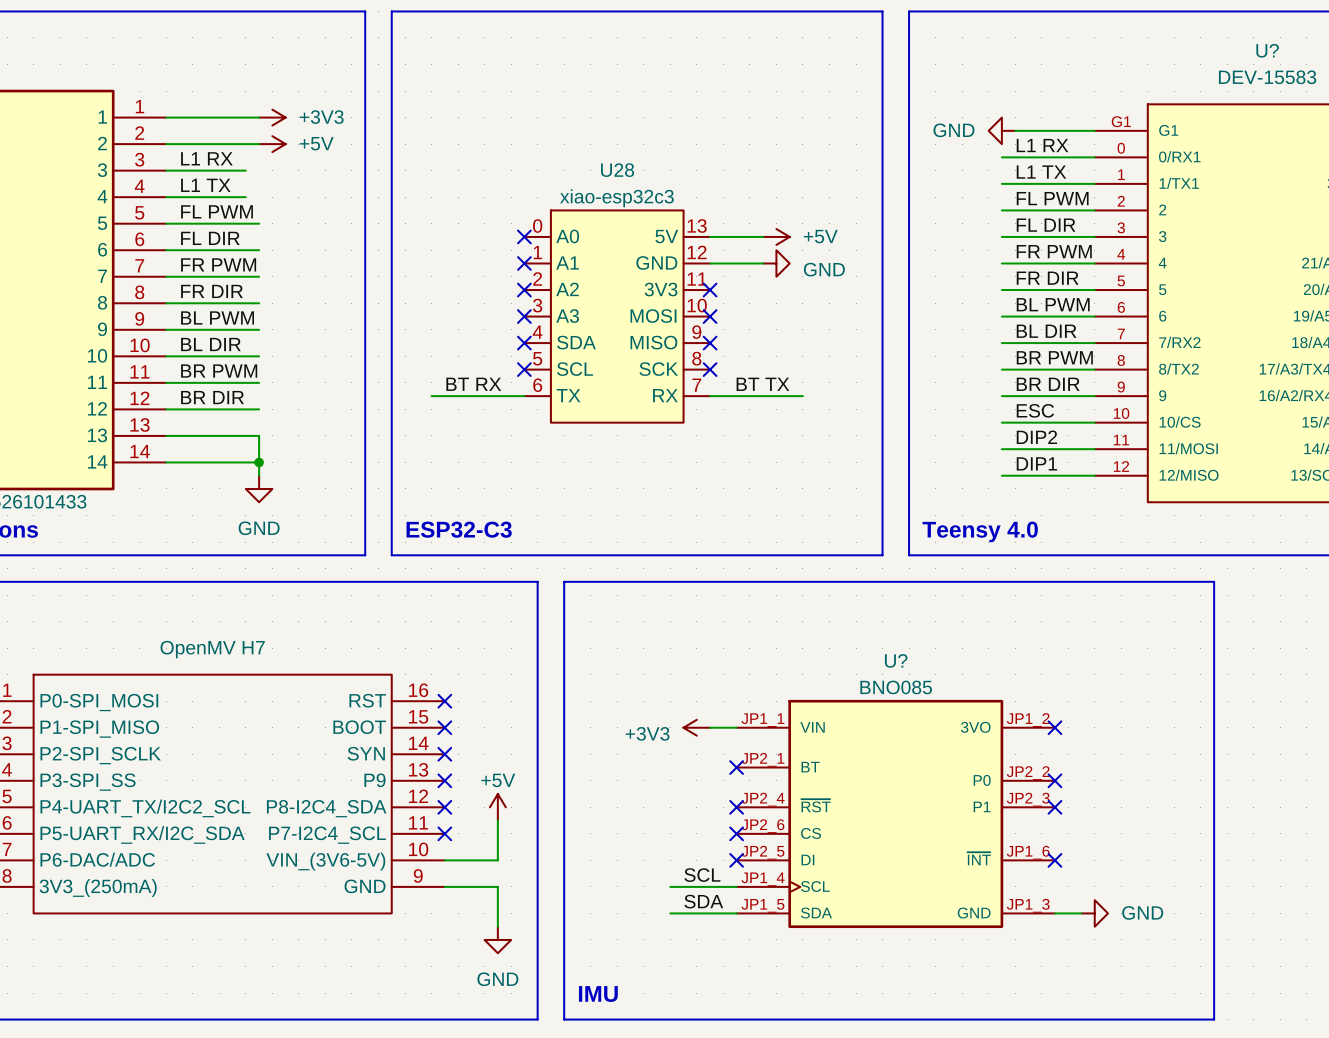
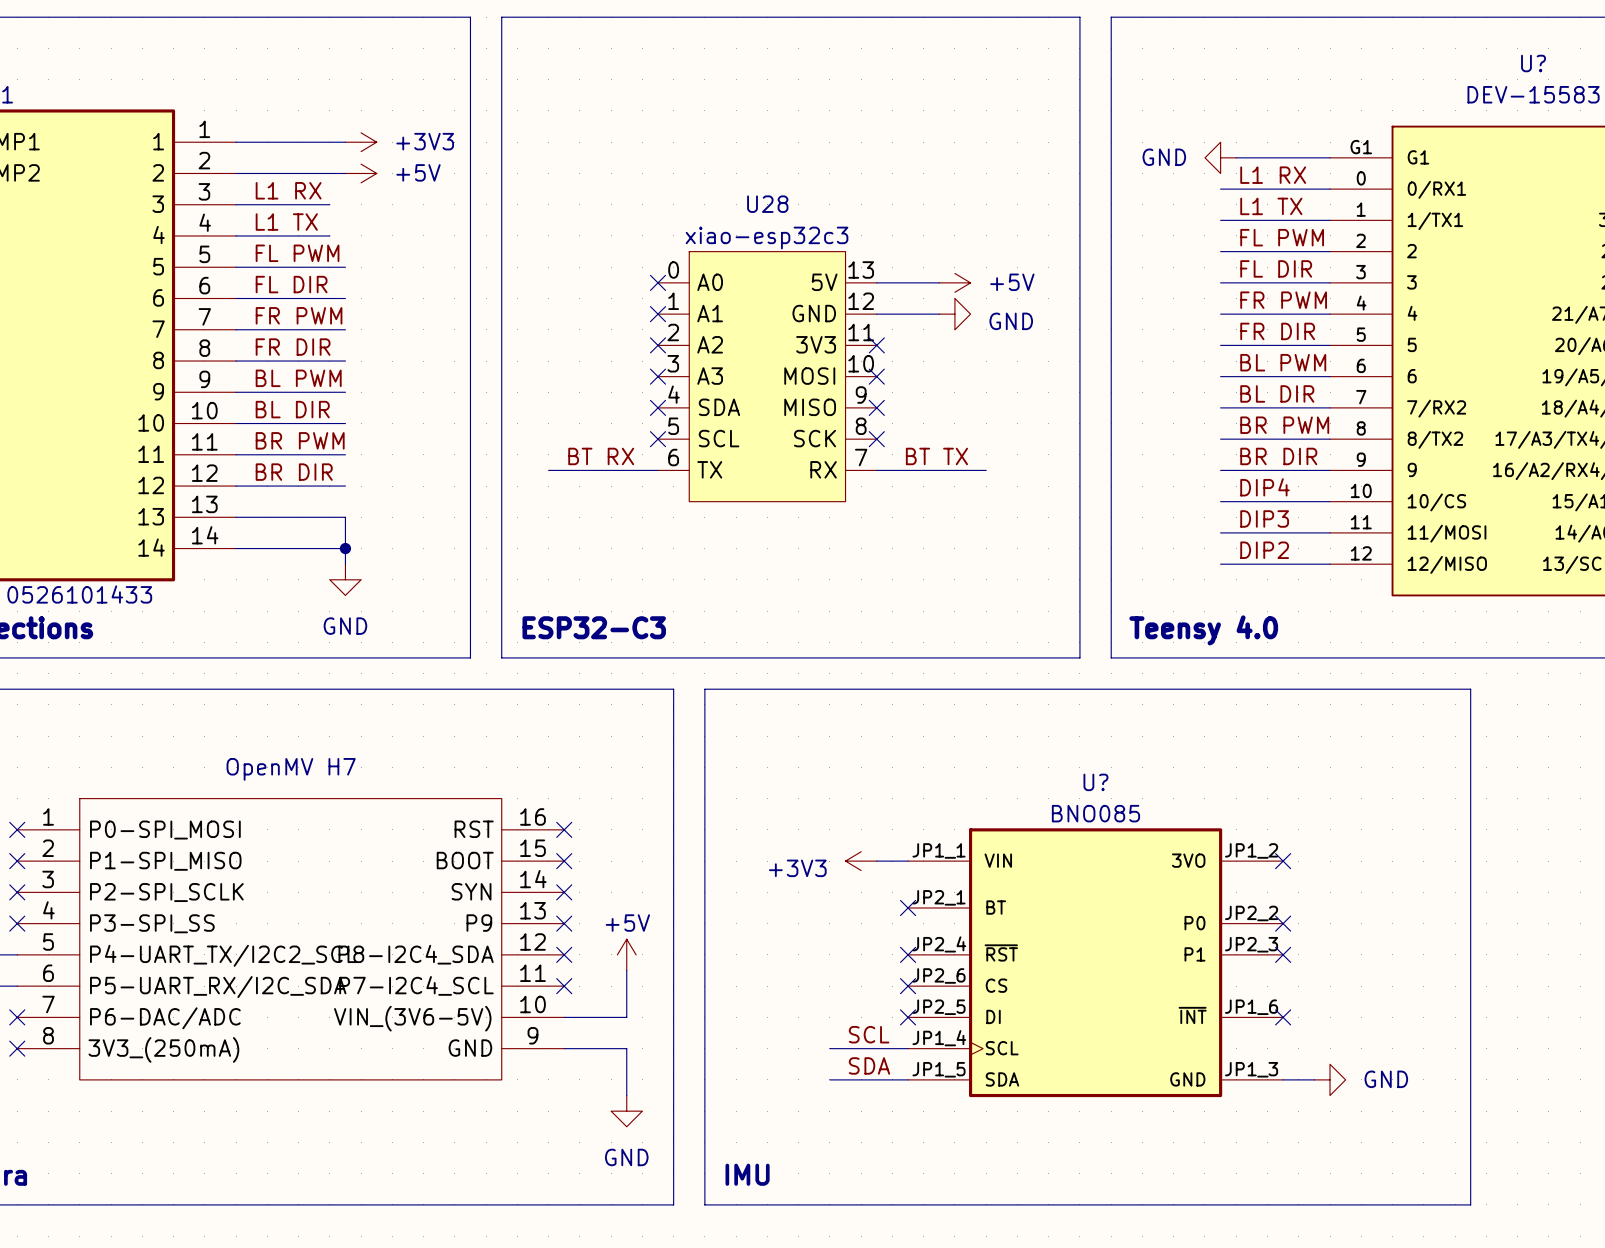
label: ESC (1035, 410) -> DIP4 (1265, 487)
label: DIP2 (1036, 437) -> DIP3 (1264, 518)
label: DIP1 (1036, 463) -> DIP2 (1264, 550)

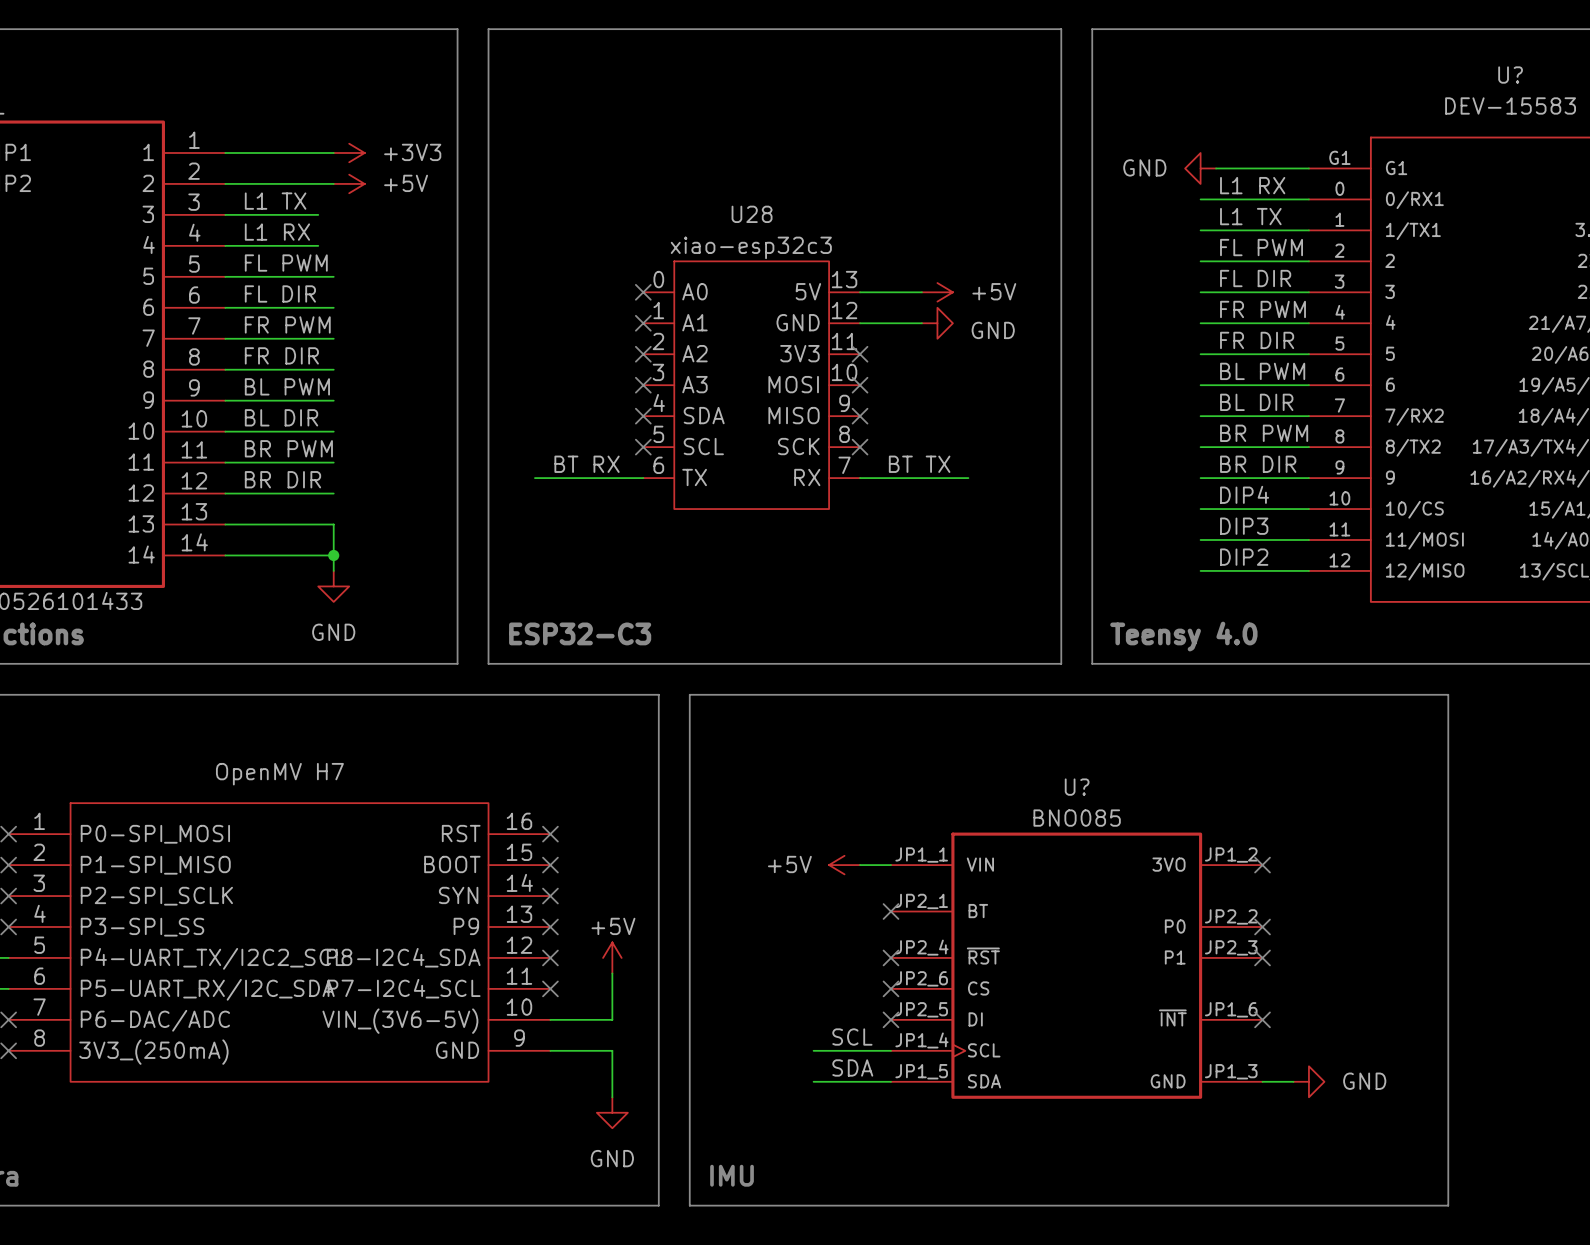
label: L1 RX (288, 190) -> L1 TX (275, 201)
label: L1 TX (286, 222) -> L1 RX (277, 232)
power symbol: +3V3 (861, 861) -> +5V (844, 865)

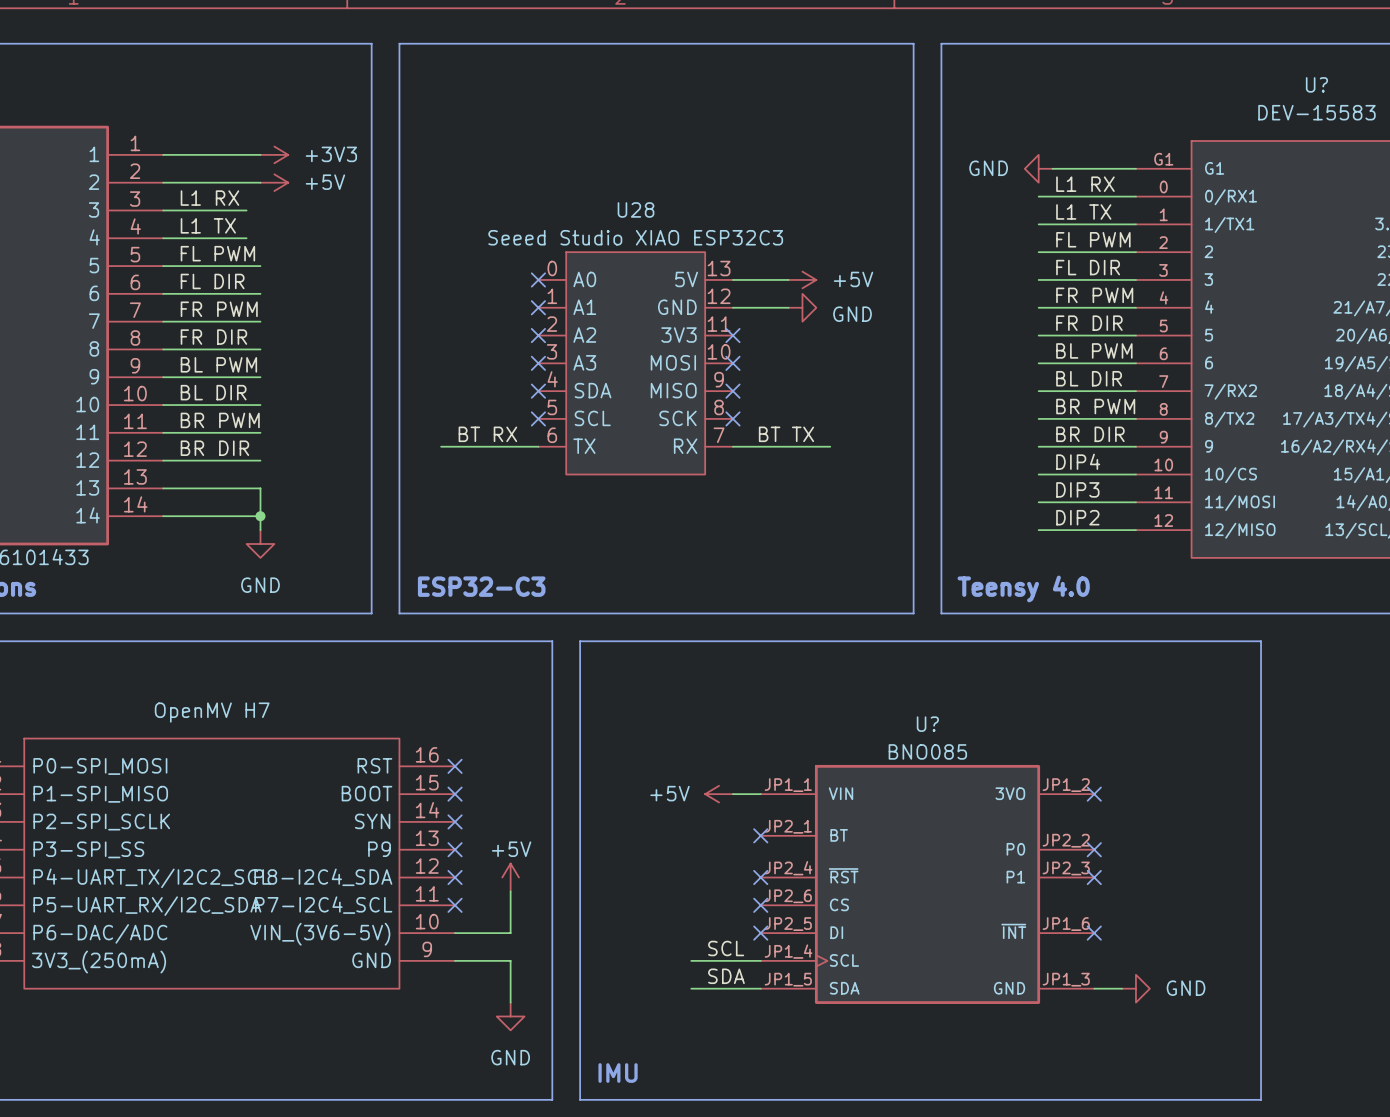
label: L1 TX (275, 201) -> L1 RX (209, 198)
label: L1 RX (277, 232) -> L1 TX (208, 225)
U28 value: xiao-esp32c3 (751, 247) -> Seeed Studio XIAO ESP32C3 (635, 237)

